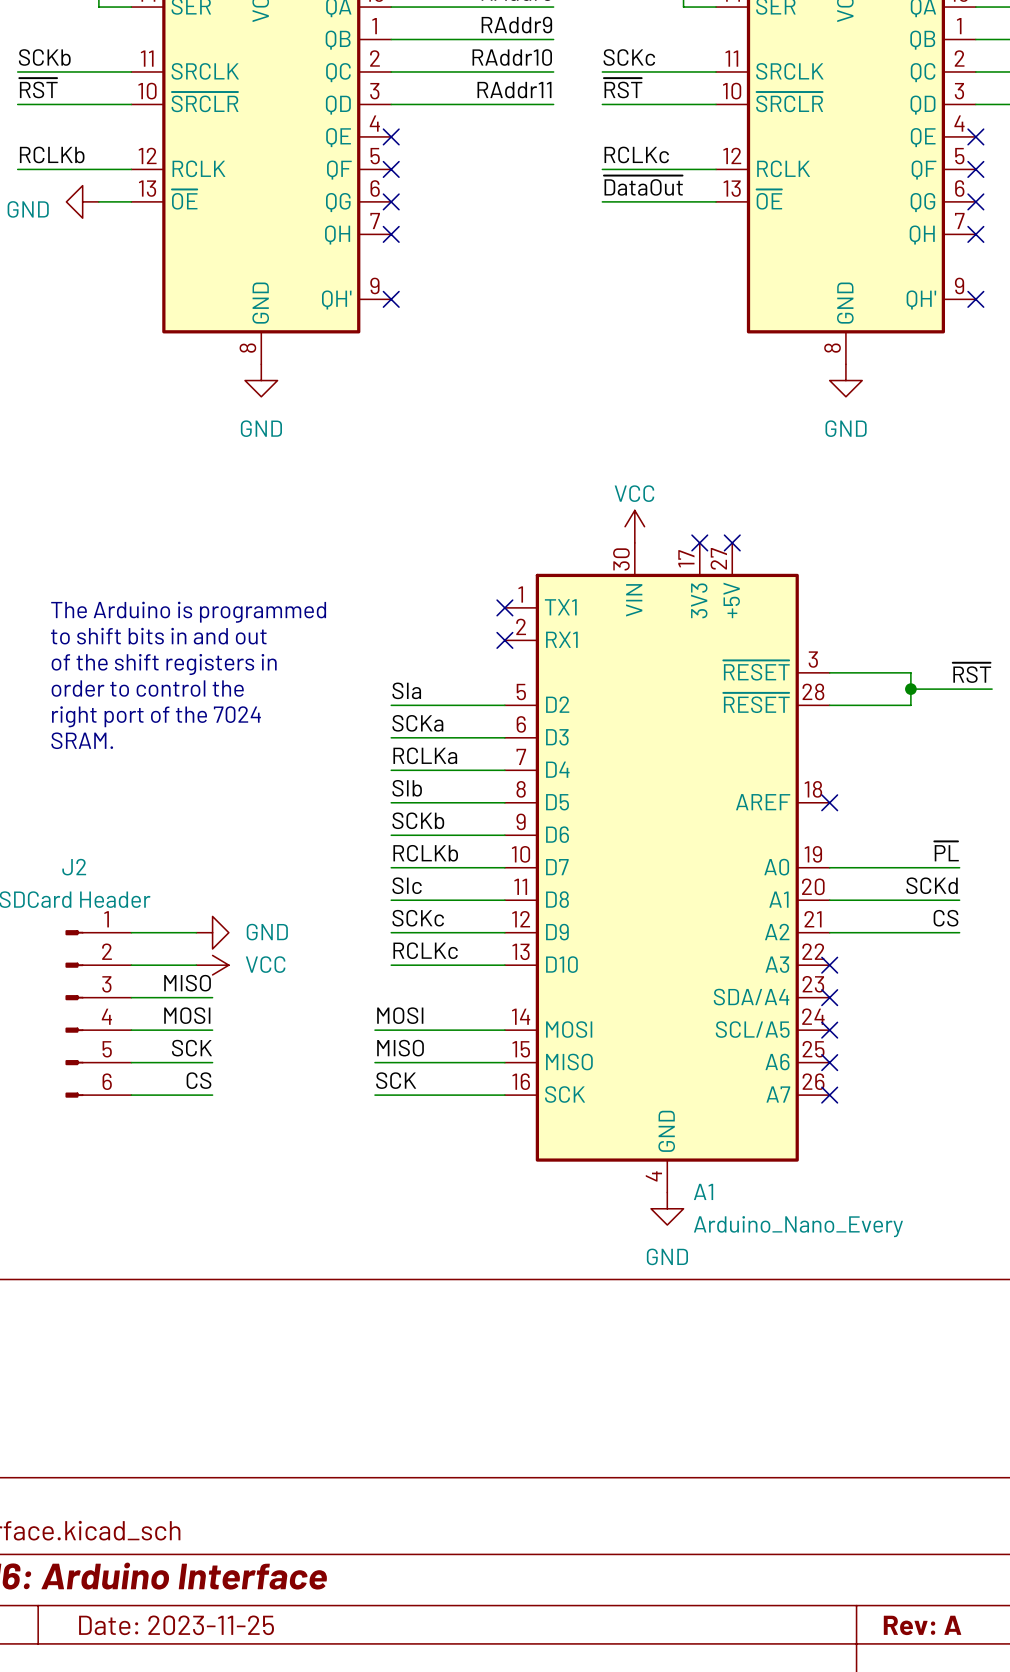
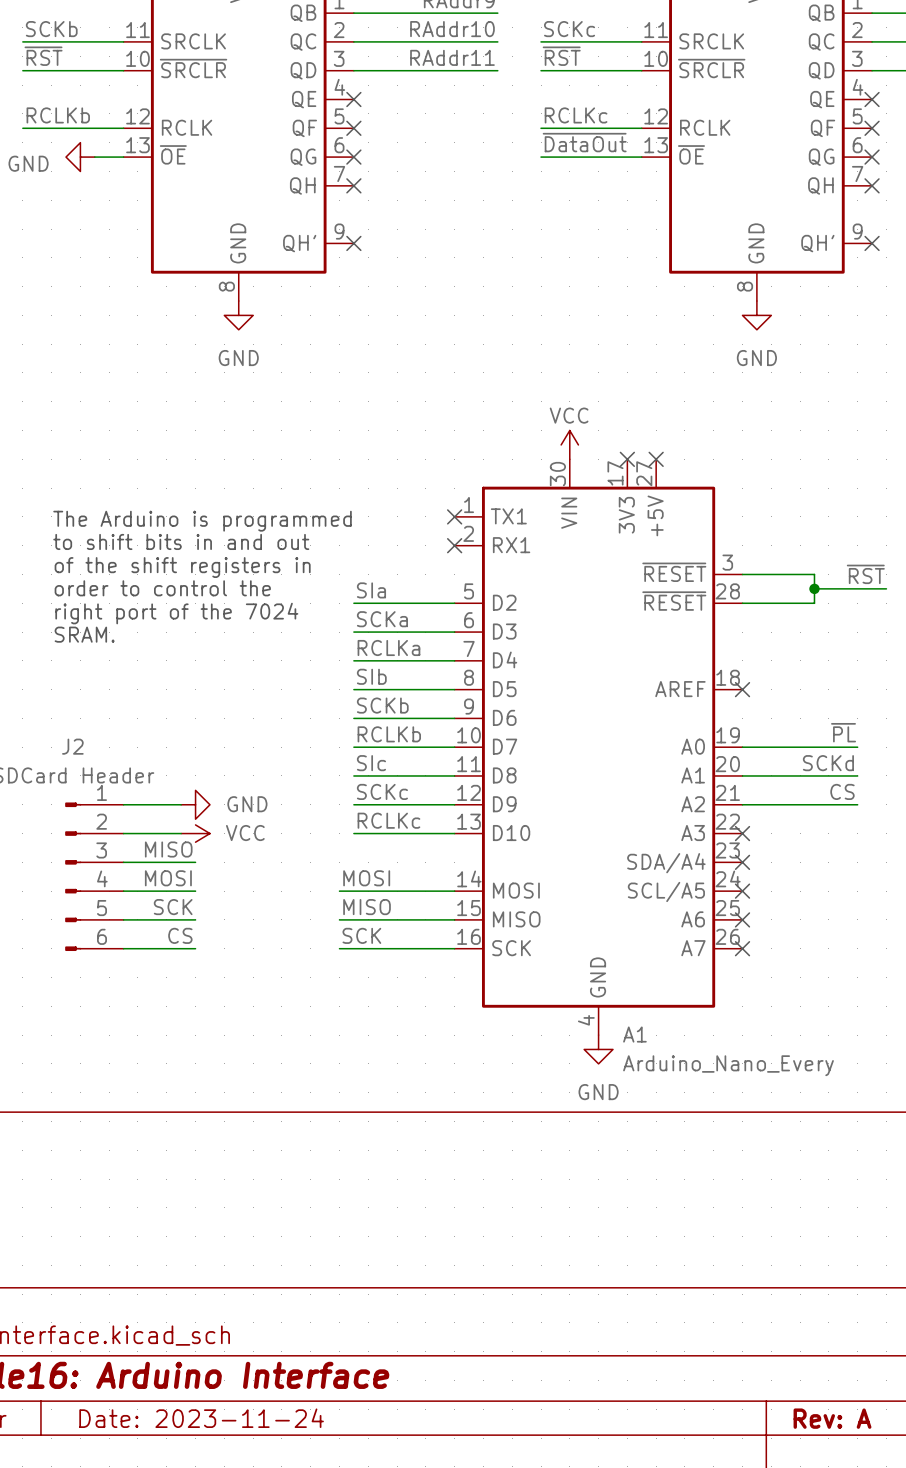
title block: Date: 2023-11-25 (176, 1625) -> Date: 2023-11-24 (201, 1418)

